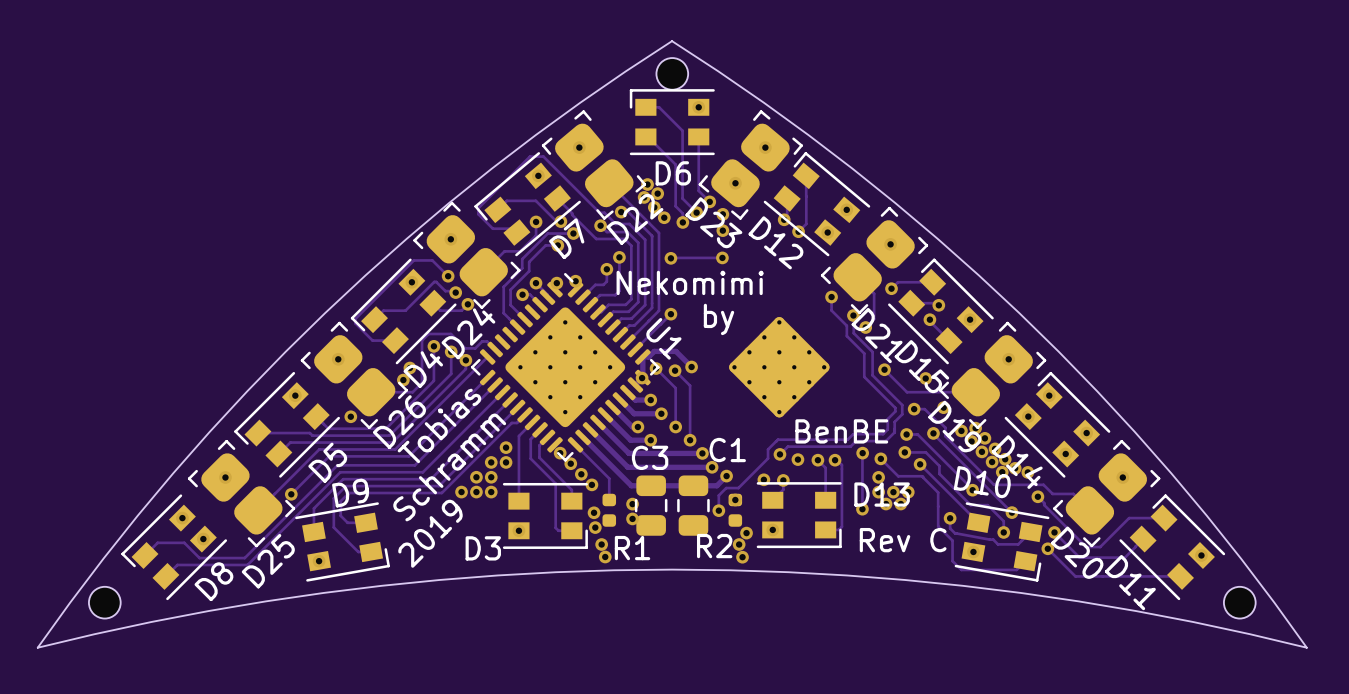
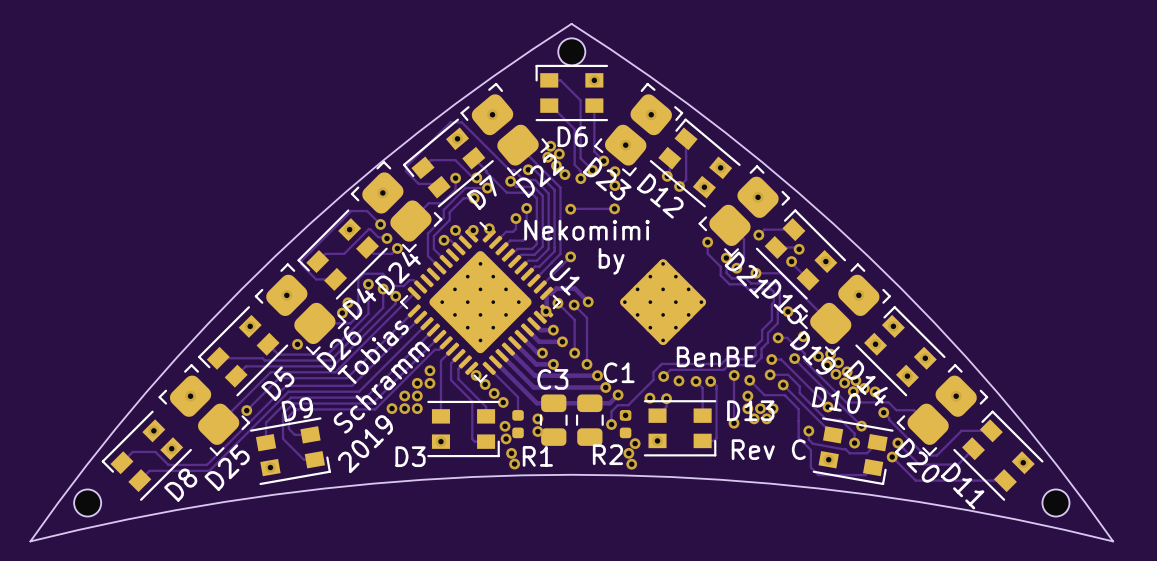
track: (859, 339) (872, 352) (872, 375) (902, 405) -> (731, 278) (746, 278) (751, 283) (776, 283) (779, 286) (777, 323) (767, 334)
track: (857, 346) (864, 353) (864, 376) (895, 407) -> (729, 284) (742, 284) (748, 289) (771, 289) (773, 292) (771, 320) (762, 330) (762, 336)
track: (884, 369) (907, 392) (975, 392) -> (755, 273) (780, 273) (830, 323)
via position: (884, 369) -> (755, 273)

